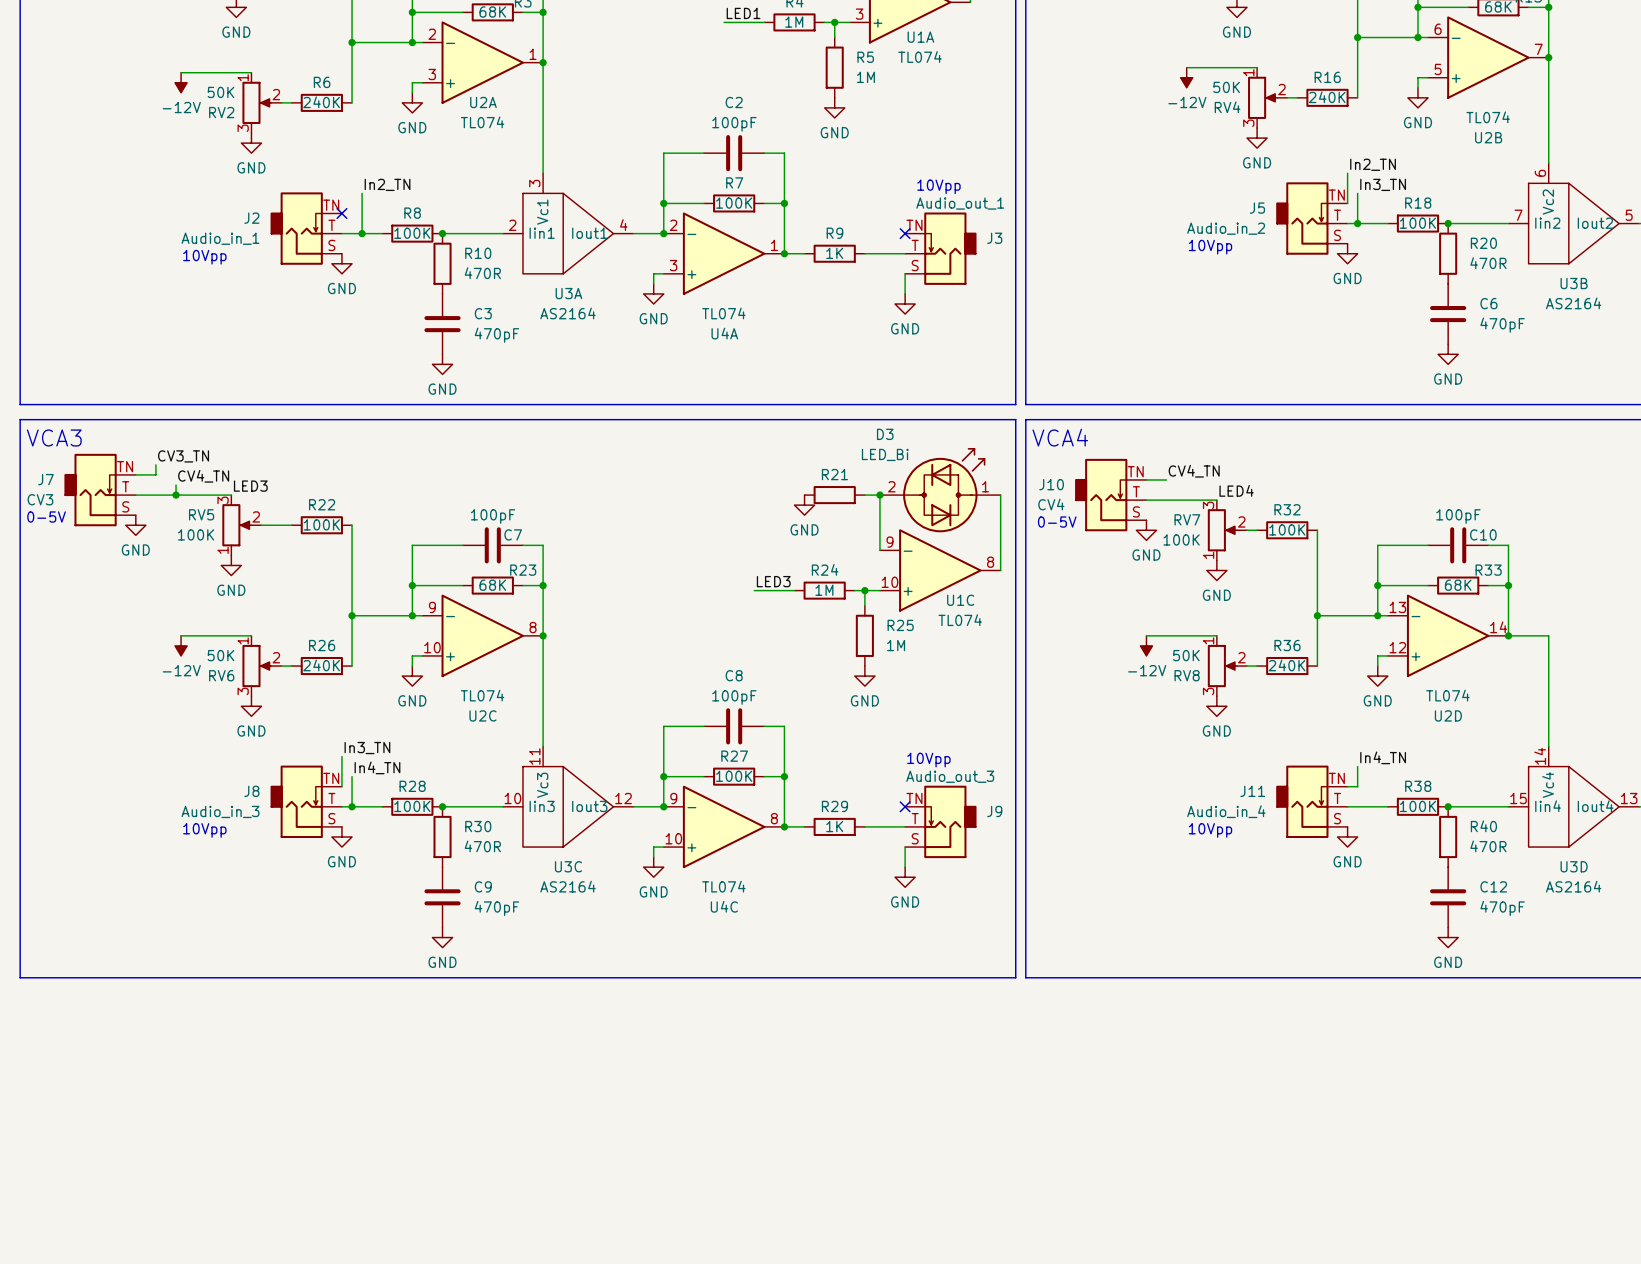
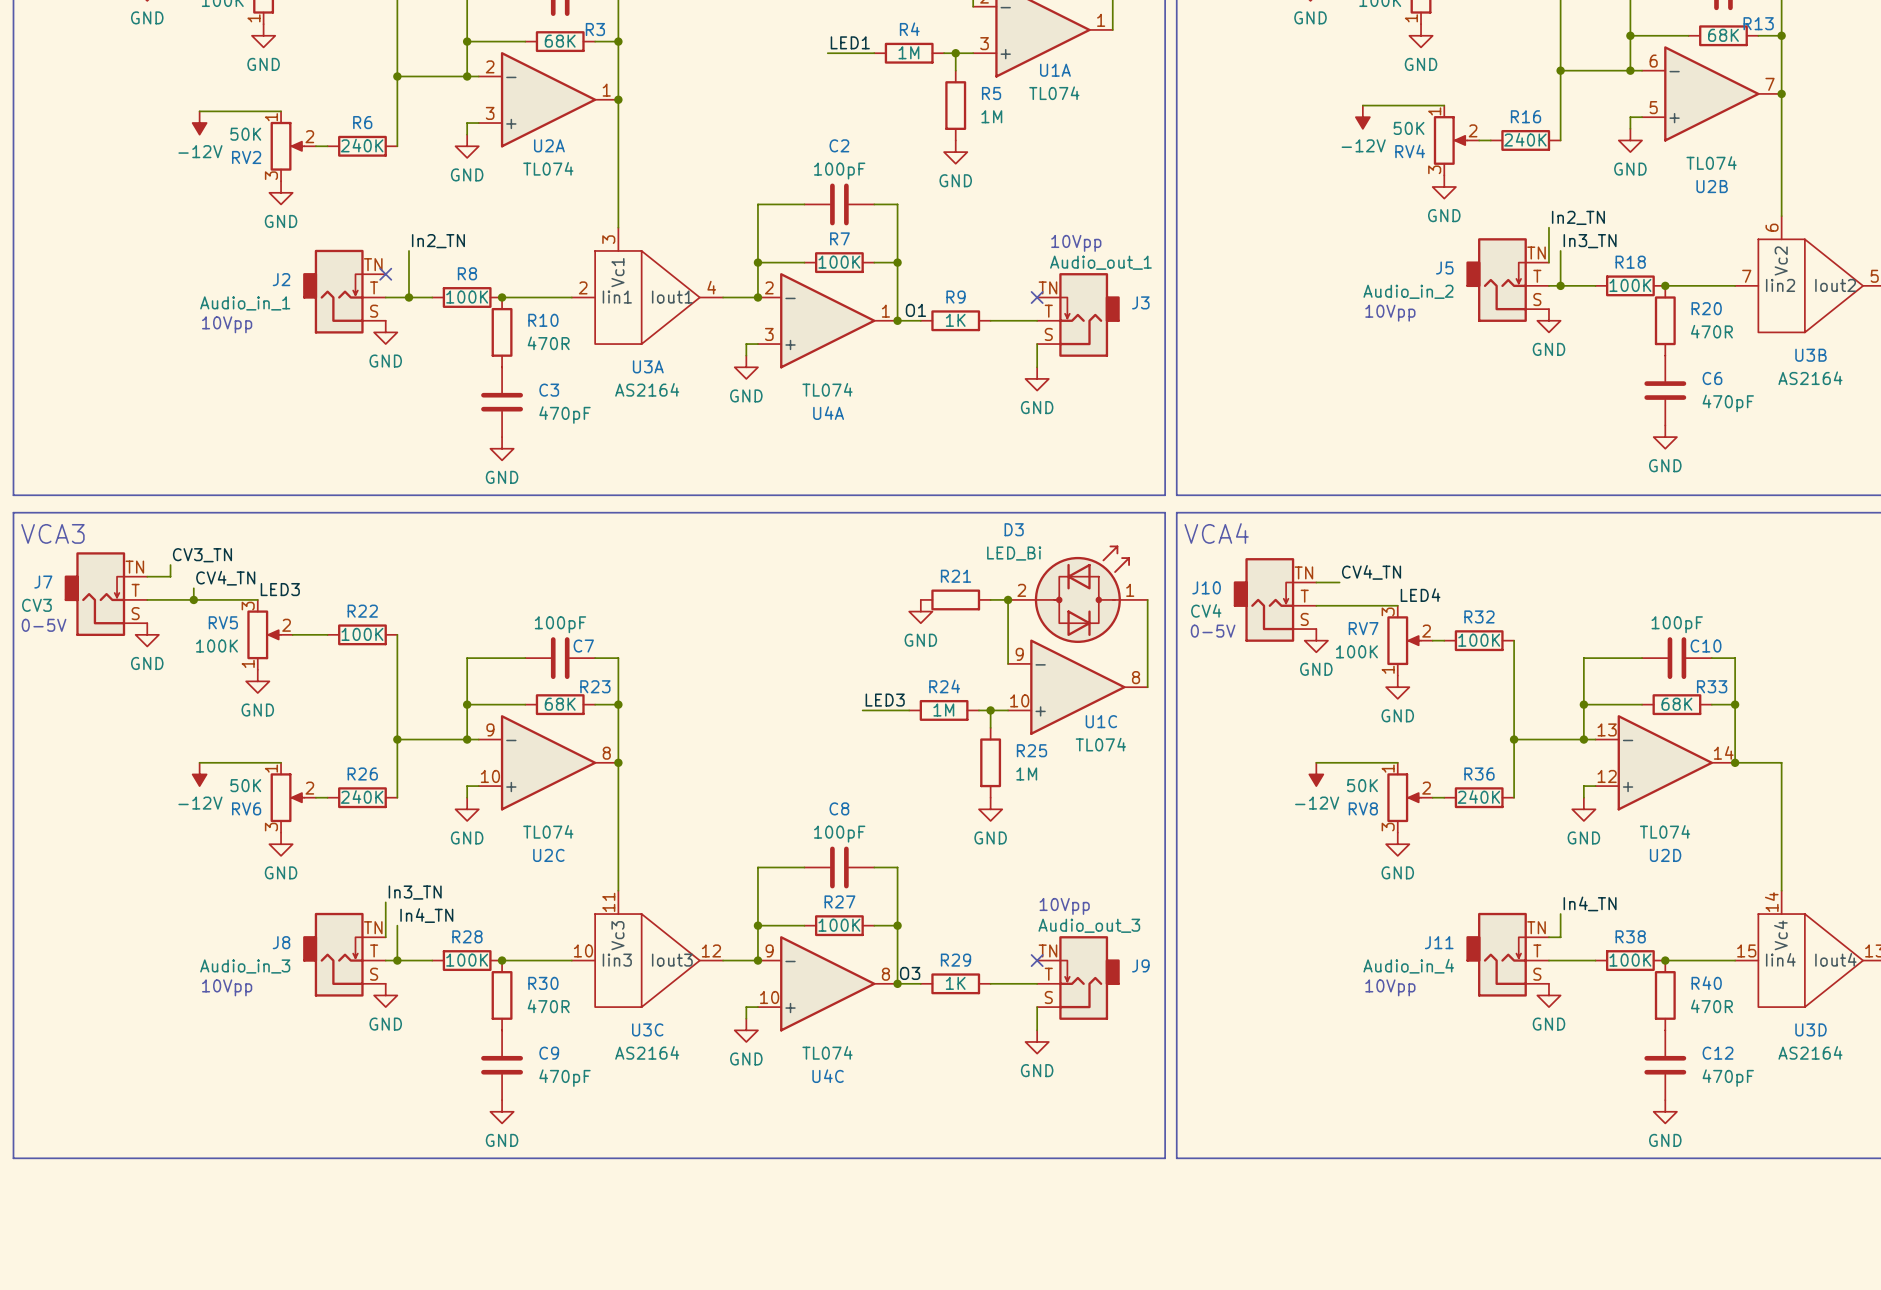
label: none -> O1 (915, 310)
label: none -> O3 (910, 973)

